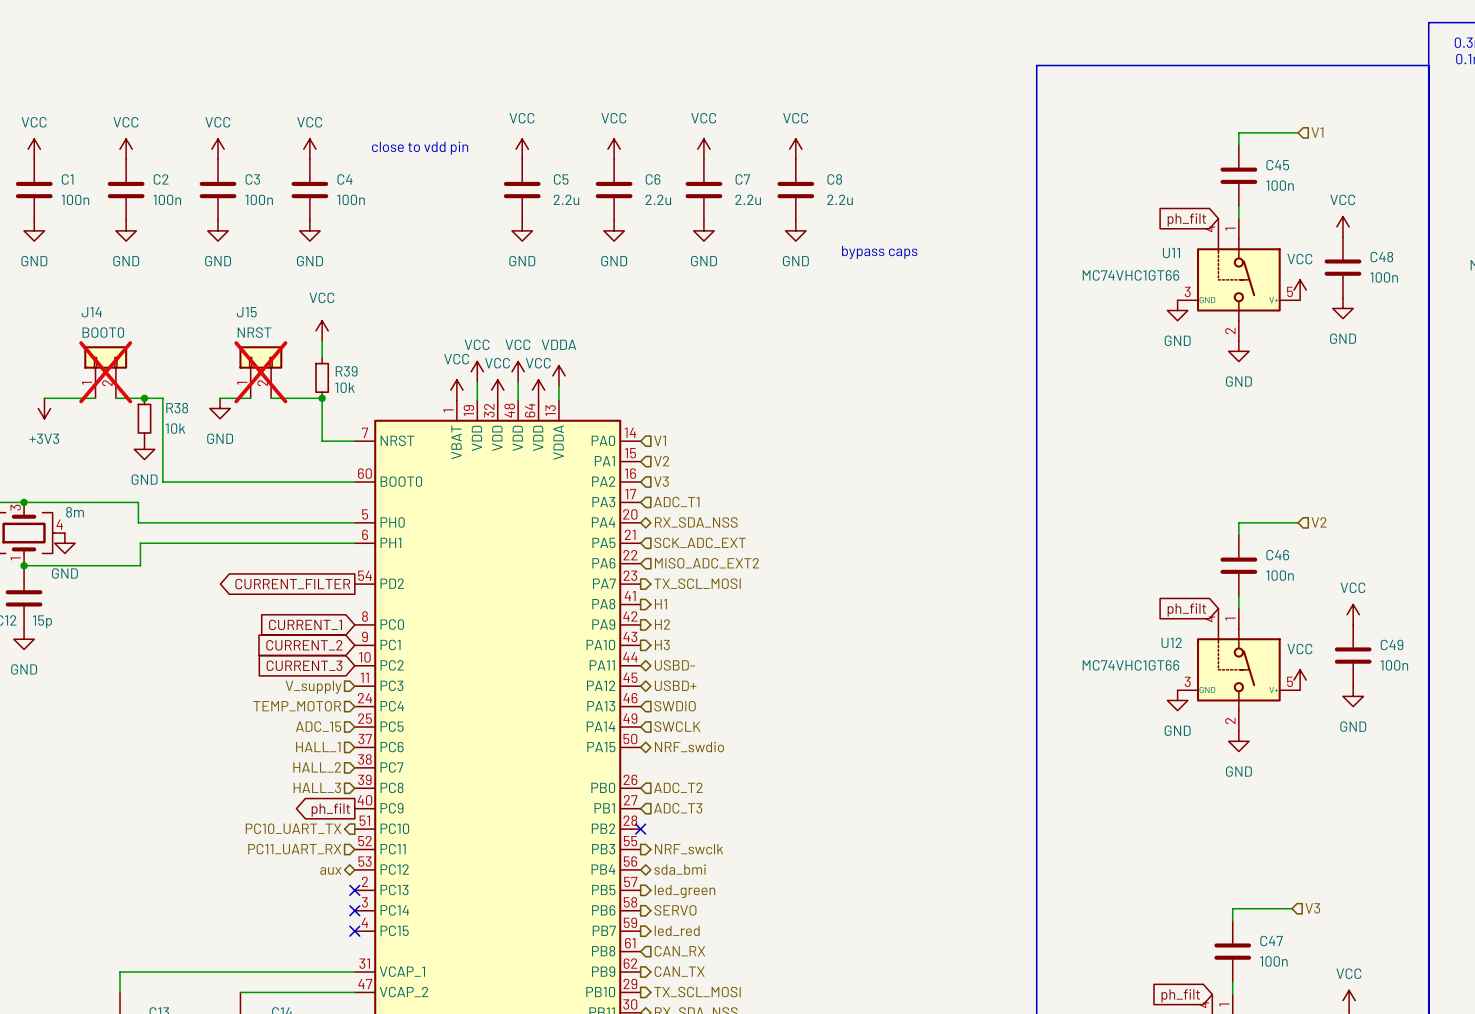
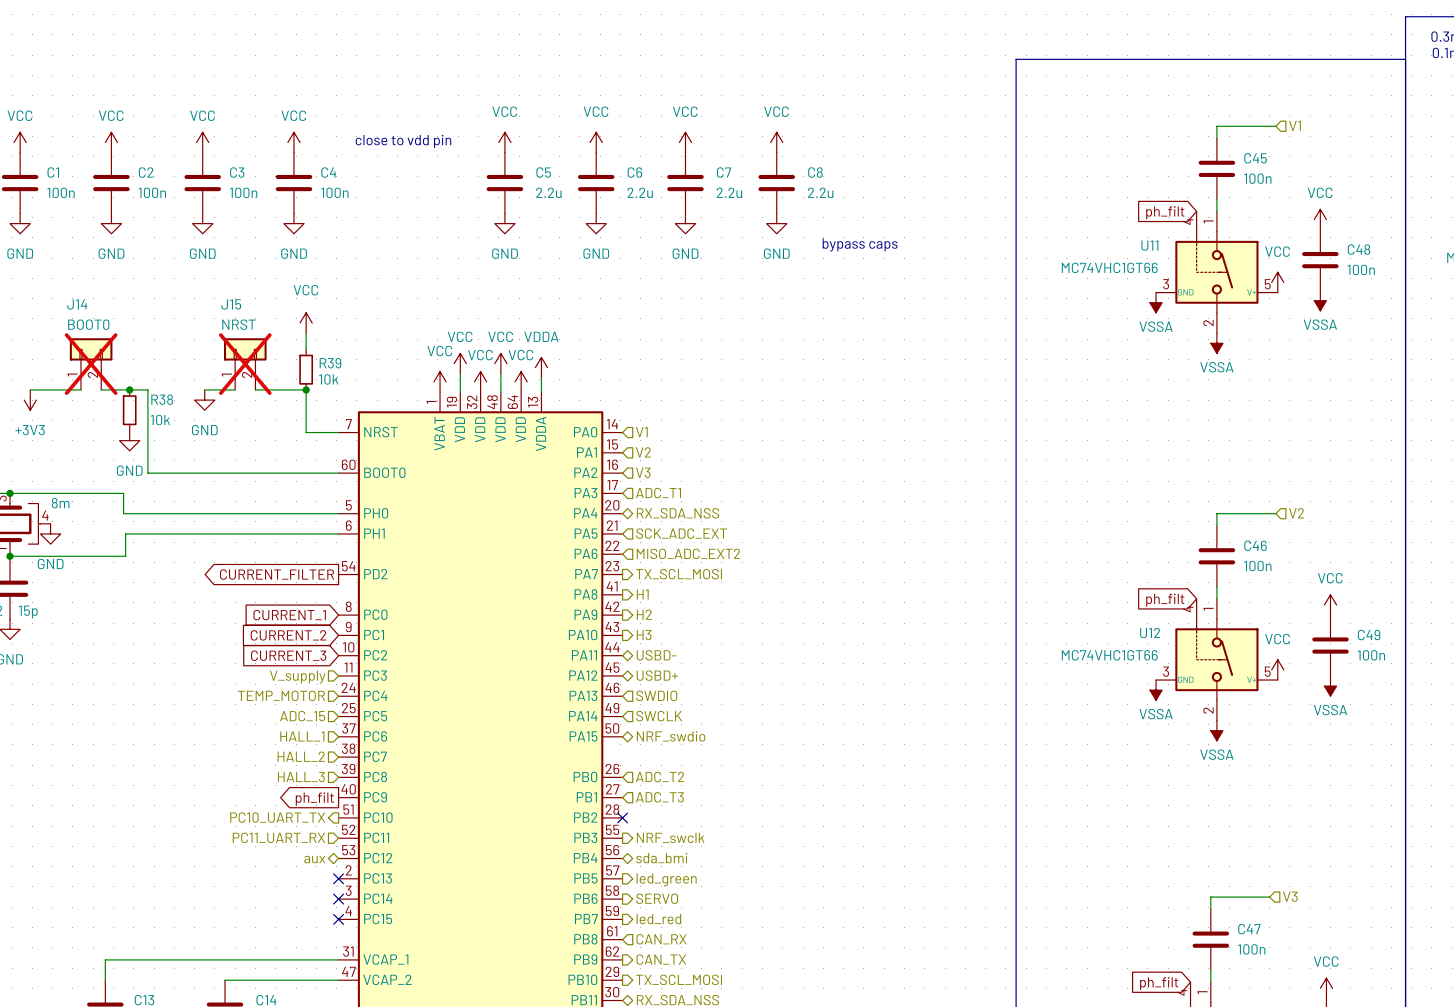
power symbol: GND (1342, 308) -> VSSA (1320, 300)
power symbol: GND (1177, 310) -> VSSA (1156, 302)
power symbol: GND (1238, 351) -> VSSA (1216, 343)
power symbol: GND (1353, 696) -> VSSA (1330, 686)
power symbol: GND (1177, 700) -> VSSA (1156, 690)
power symbol: GND (1238, 741) -> VSSA (1216, 730)

